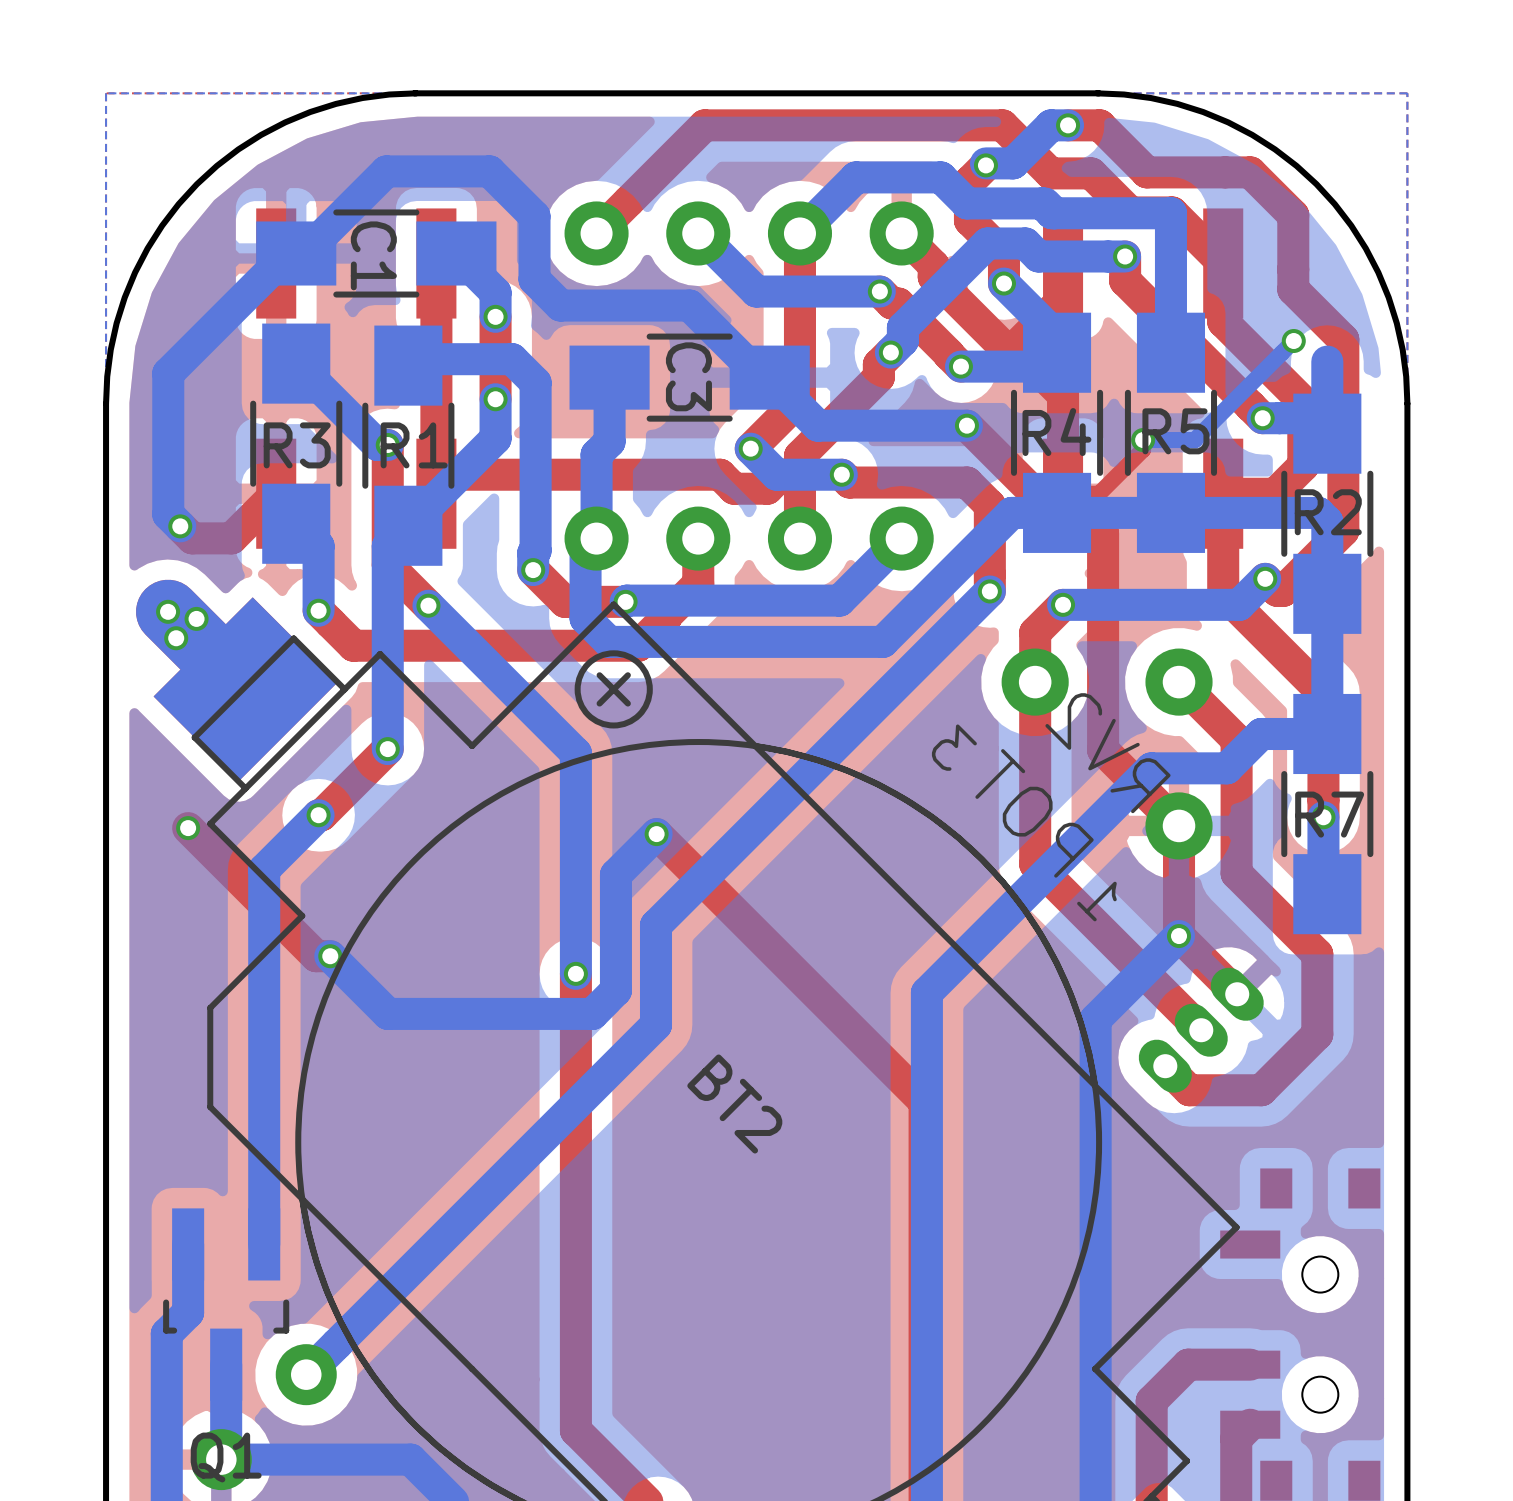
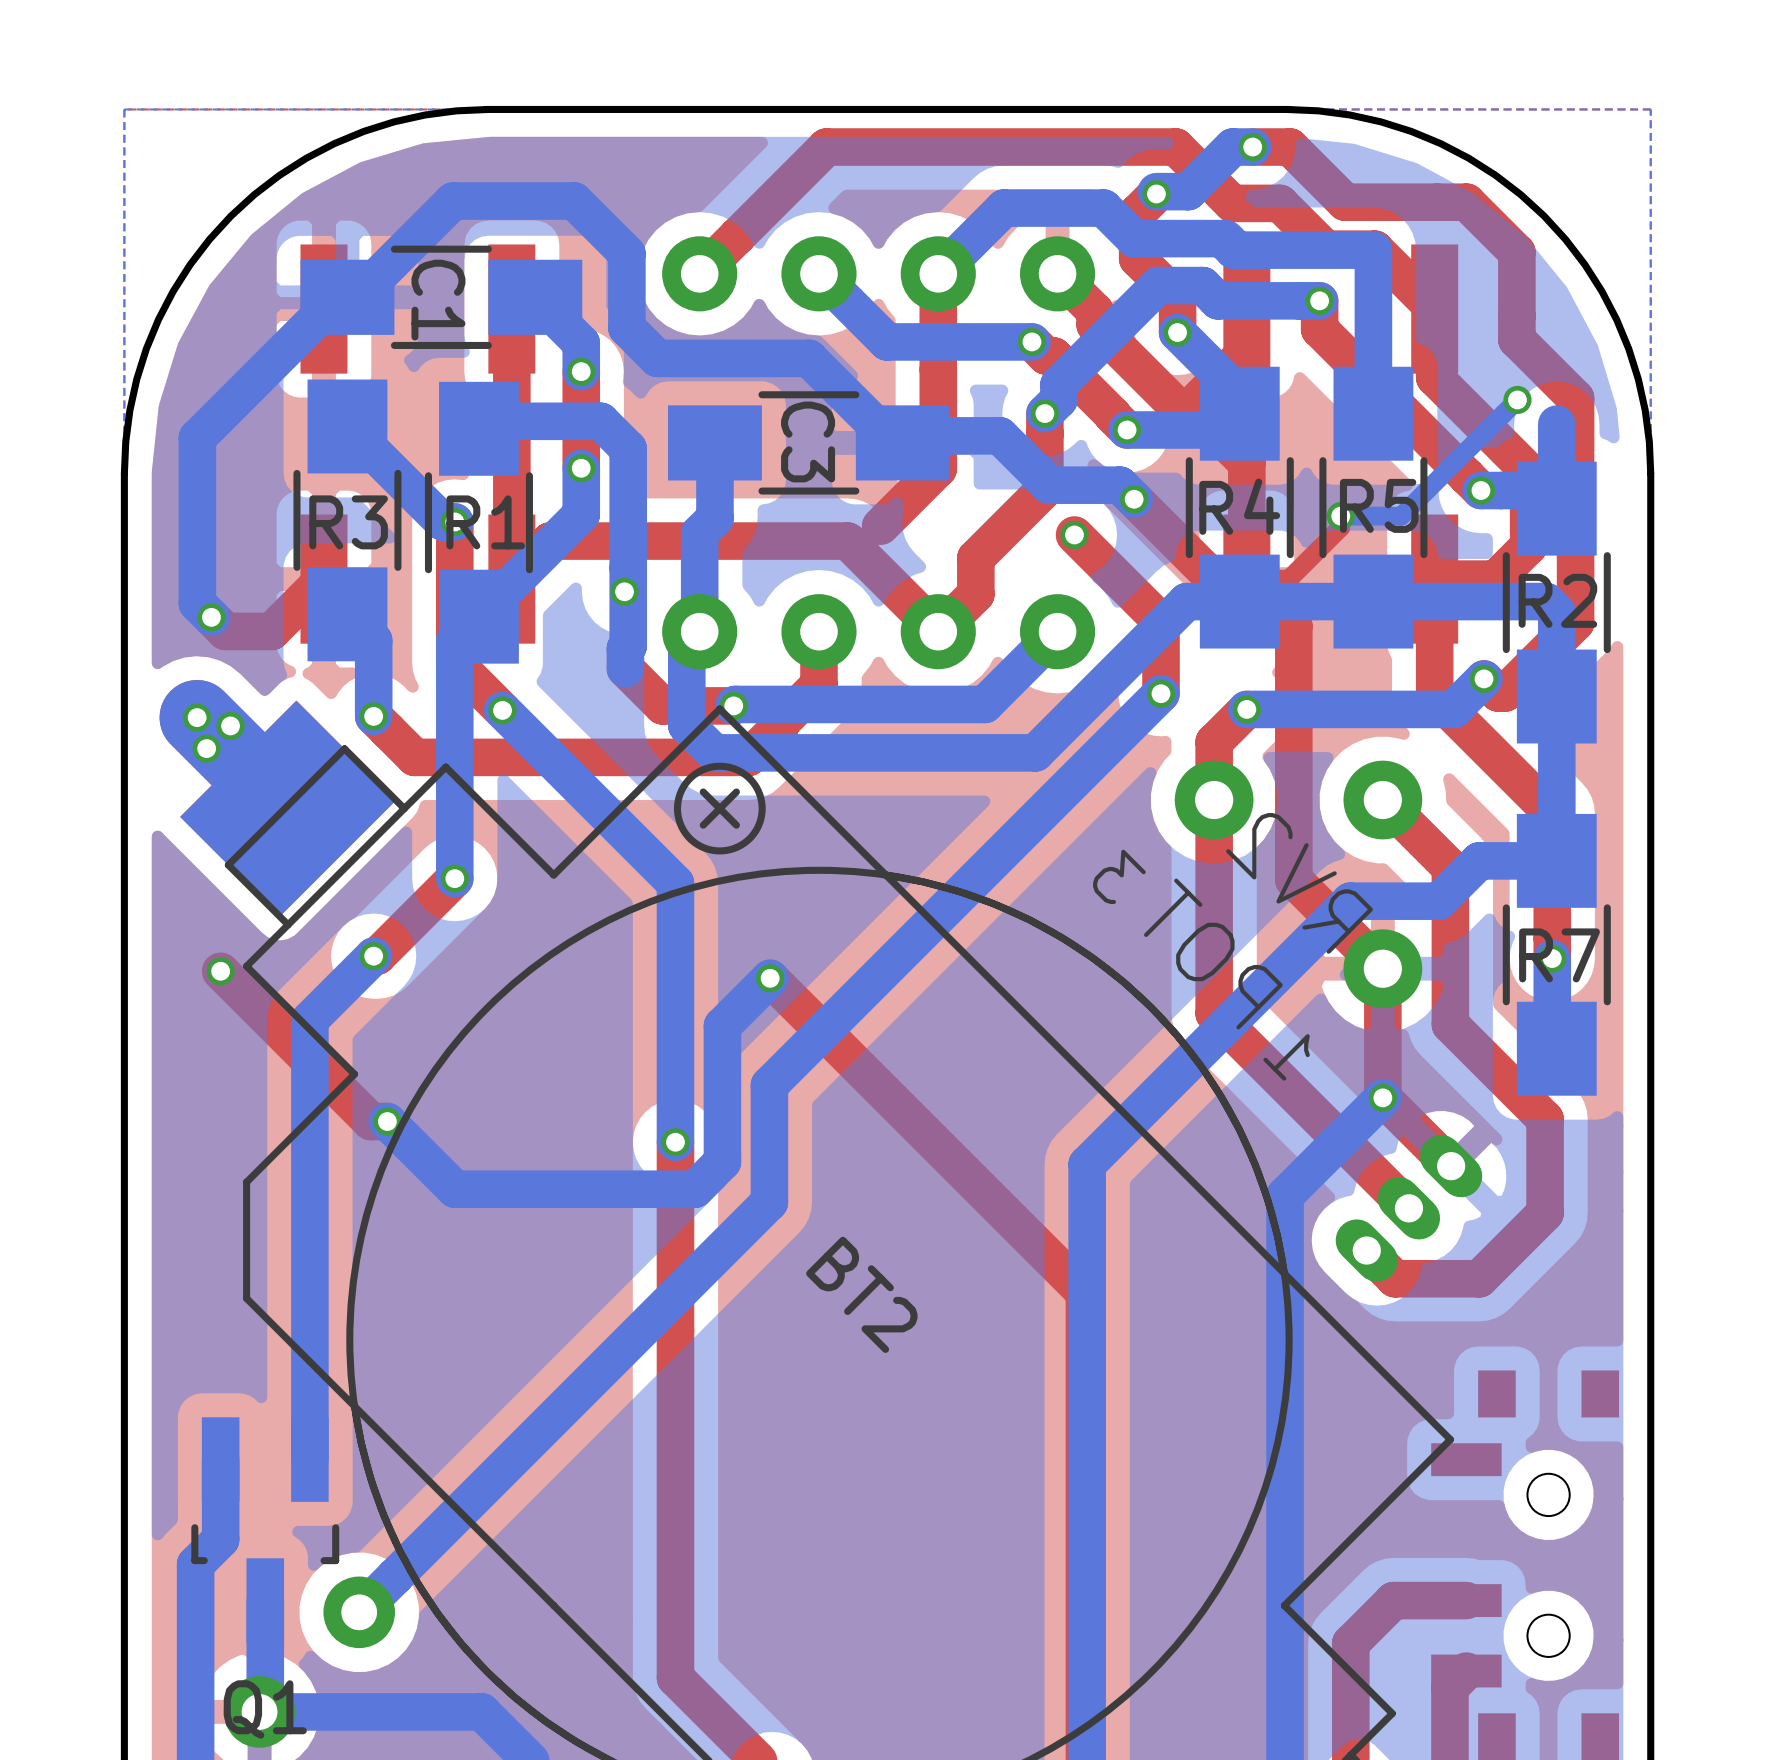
top track: (890, 352) (878, 364) (878, 377) (799, 456) (799, 538) -> none
bottom track: (769, 377) (817, 425) (966, 425) -> (902, 442) (909, 435) (1000, 435) (1049, 485) (1120, 485) (1134, 499)
bottom track: (750, 448) (776, 474) (841, 474) -> none
via: (750, 448) -> none
top track: (799, 474) (781, 474) (767, 488) (734, 488) (720, 474) (455, 474) -> (1044, 413) (1044, 489) (975, 558) (975, 594) (938, 631) (847, 541) (549, 541) (534, 556)
top track: (841, 474) (849, 482) (967, 482) (989, 505) (989, 529) -> (1074, 534) (1160, 621)
via position: (841, 474) -> (1074, 534)
via position: (533, 570) -> (624, 591)

